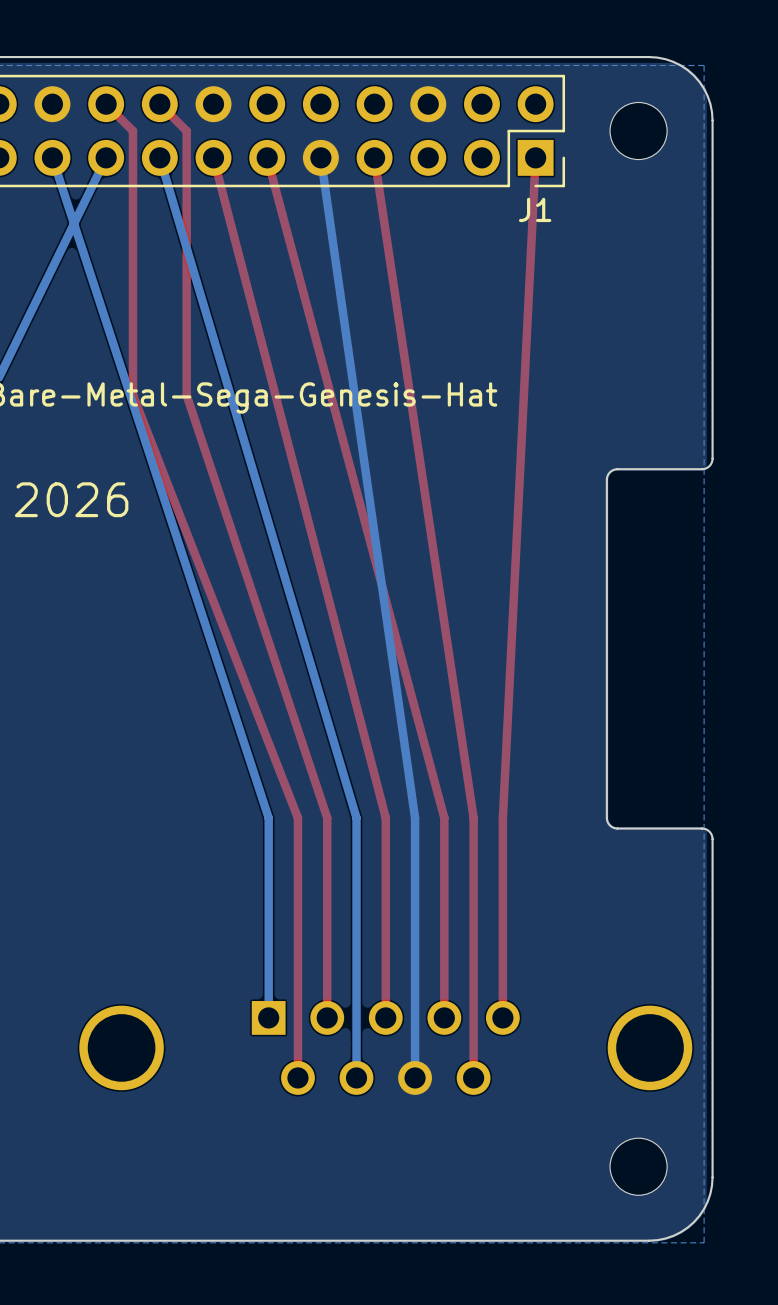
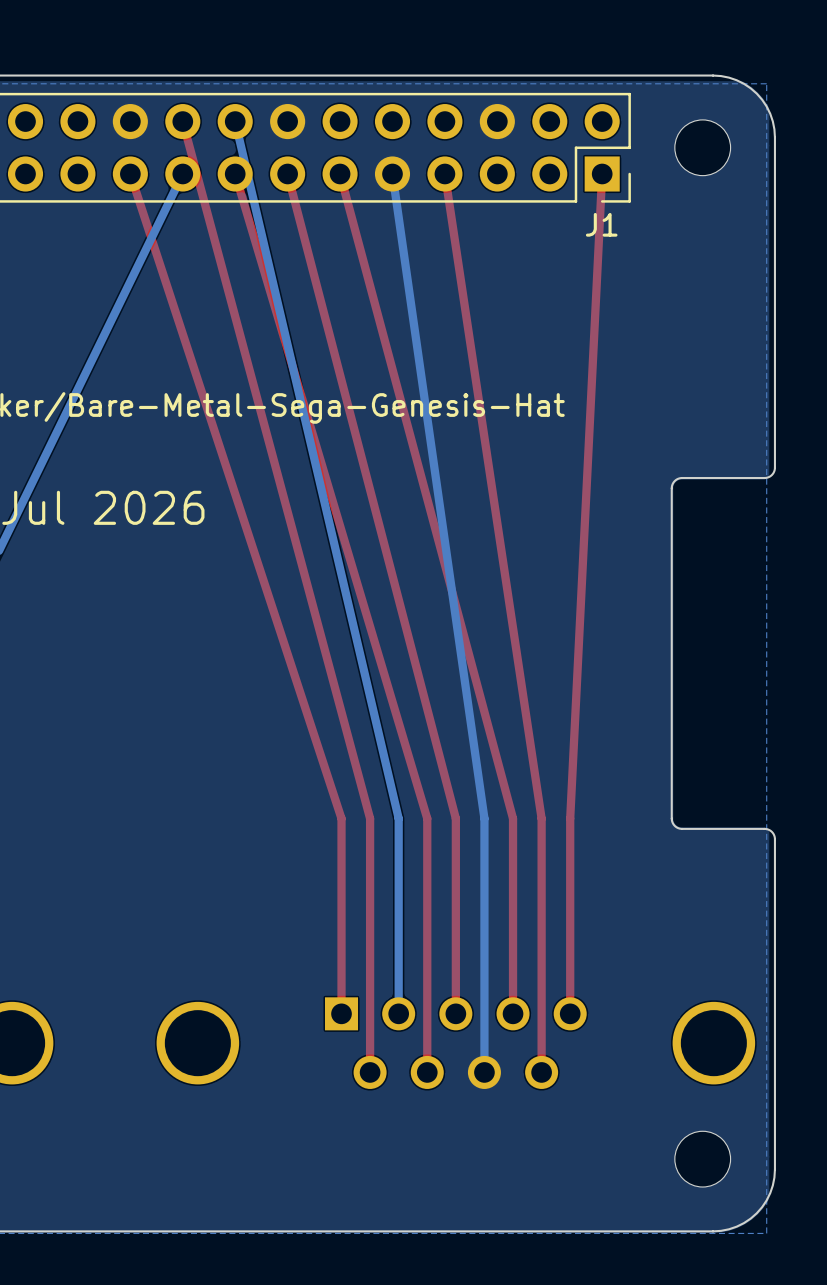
top track: (106, 104) (132, 131) (132, 395) (297, 817) -> (182, 121) (370, 818)
top track: (159, 104) (186, 131) (186, 395) (327, 817) (327, 1017) -> none
bottom track: none -> (235, 121) (398, 818) (398, 1013)
top track: none -> (130, 173) (341, 818) (341, 1013)
bottom track: (52, 157) (268, 817) (268, 1017) -> none
top track: none -> (235, 173) (427, 818) (427, 1072)
bottom track: (159, 157) (356, 817) (356, 1077) -> none

